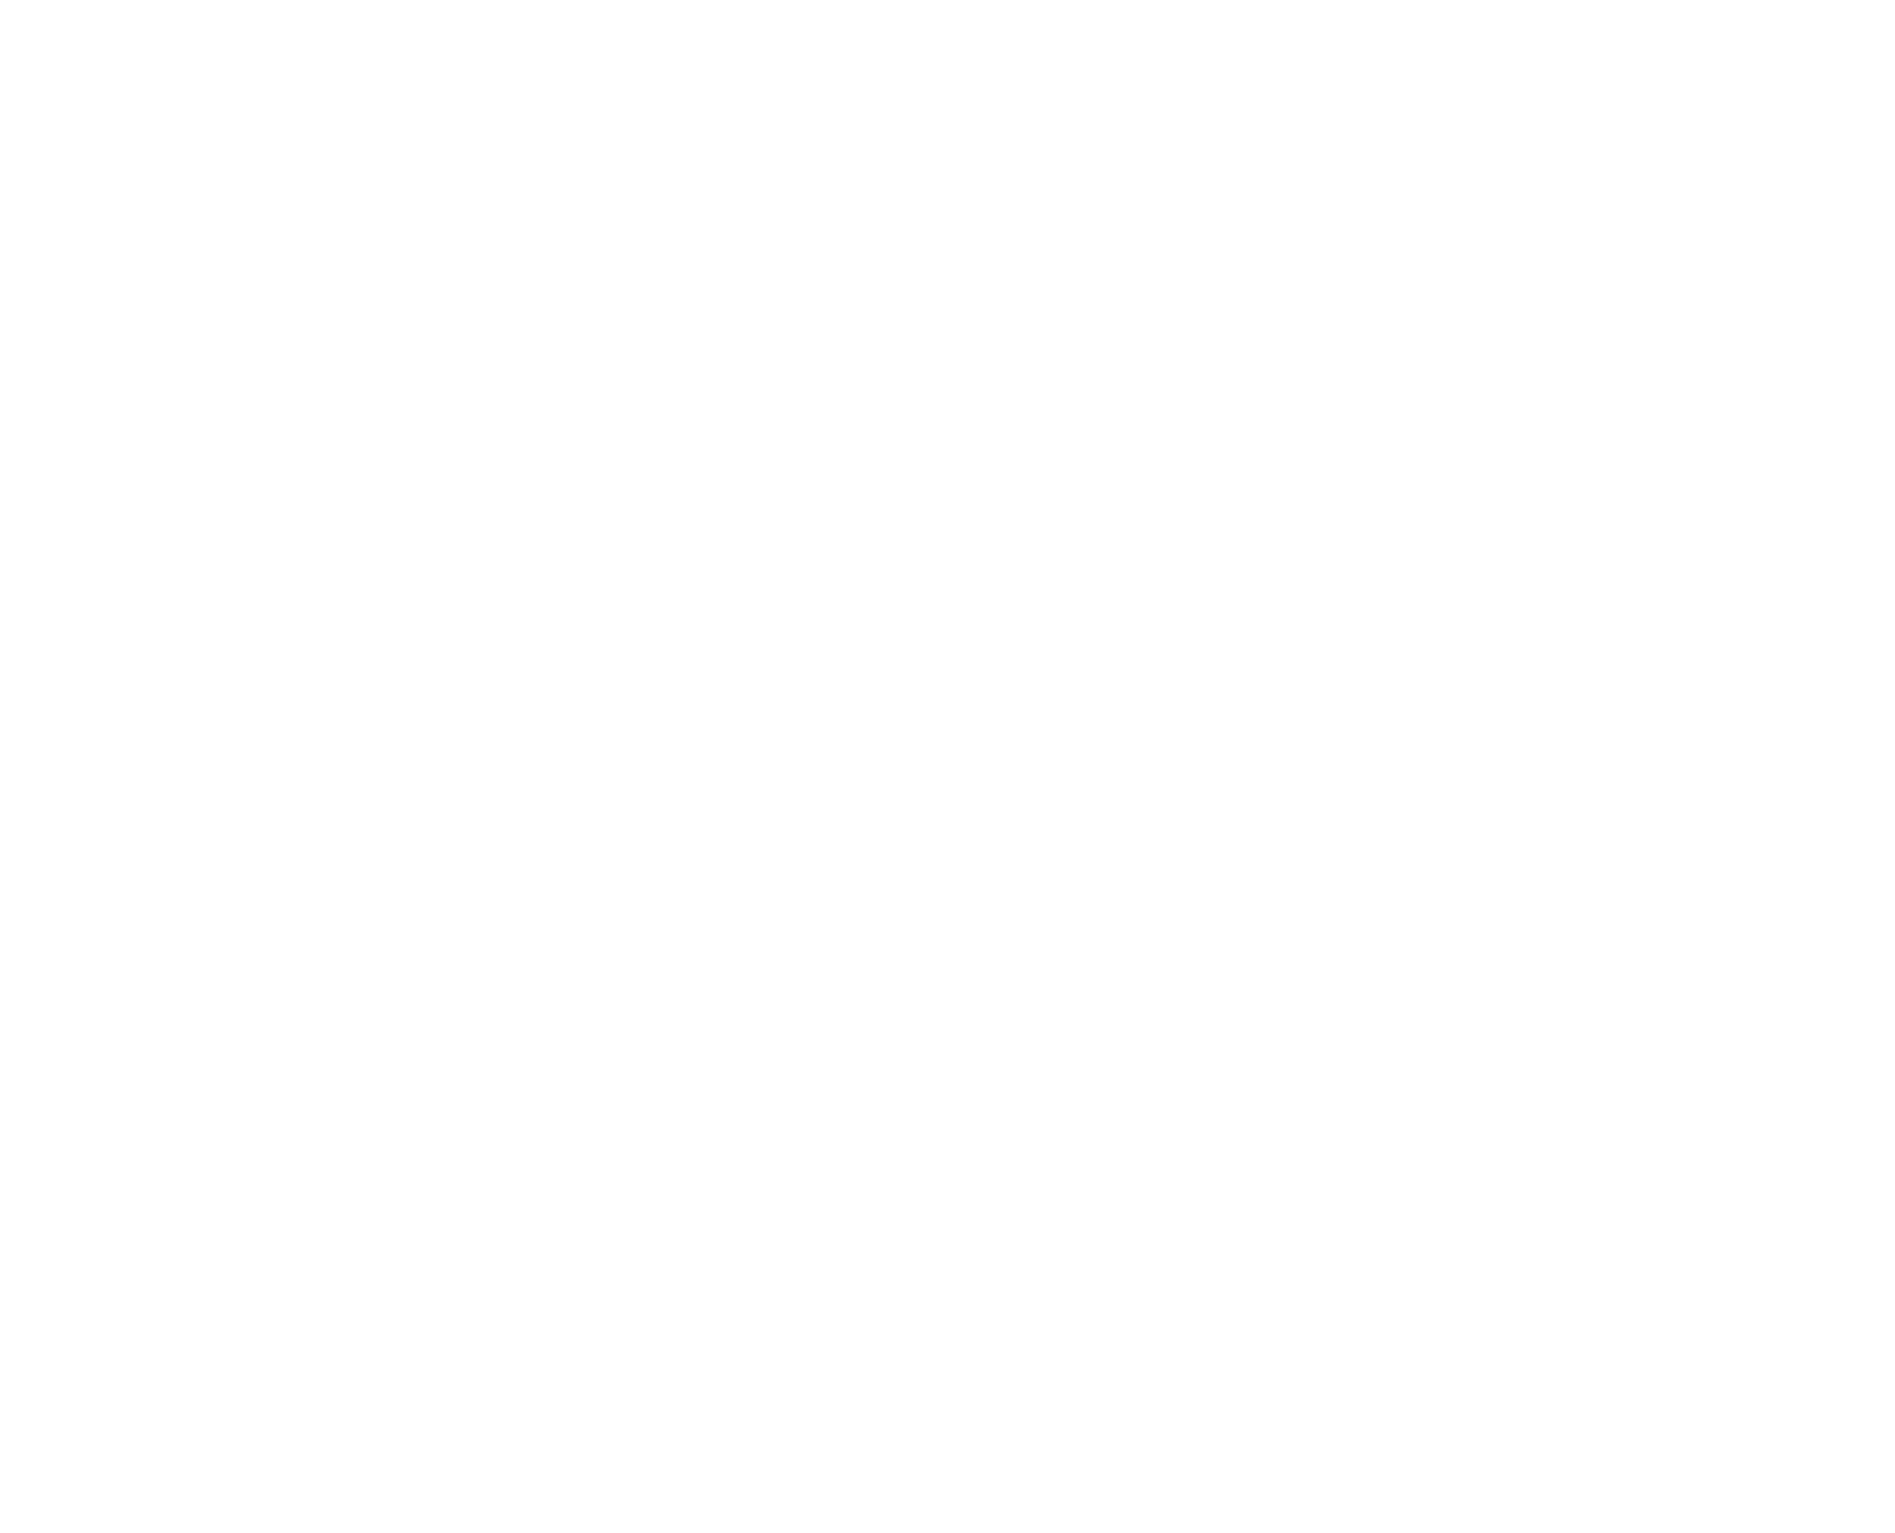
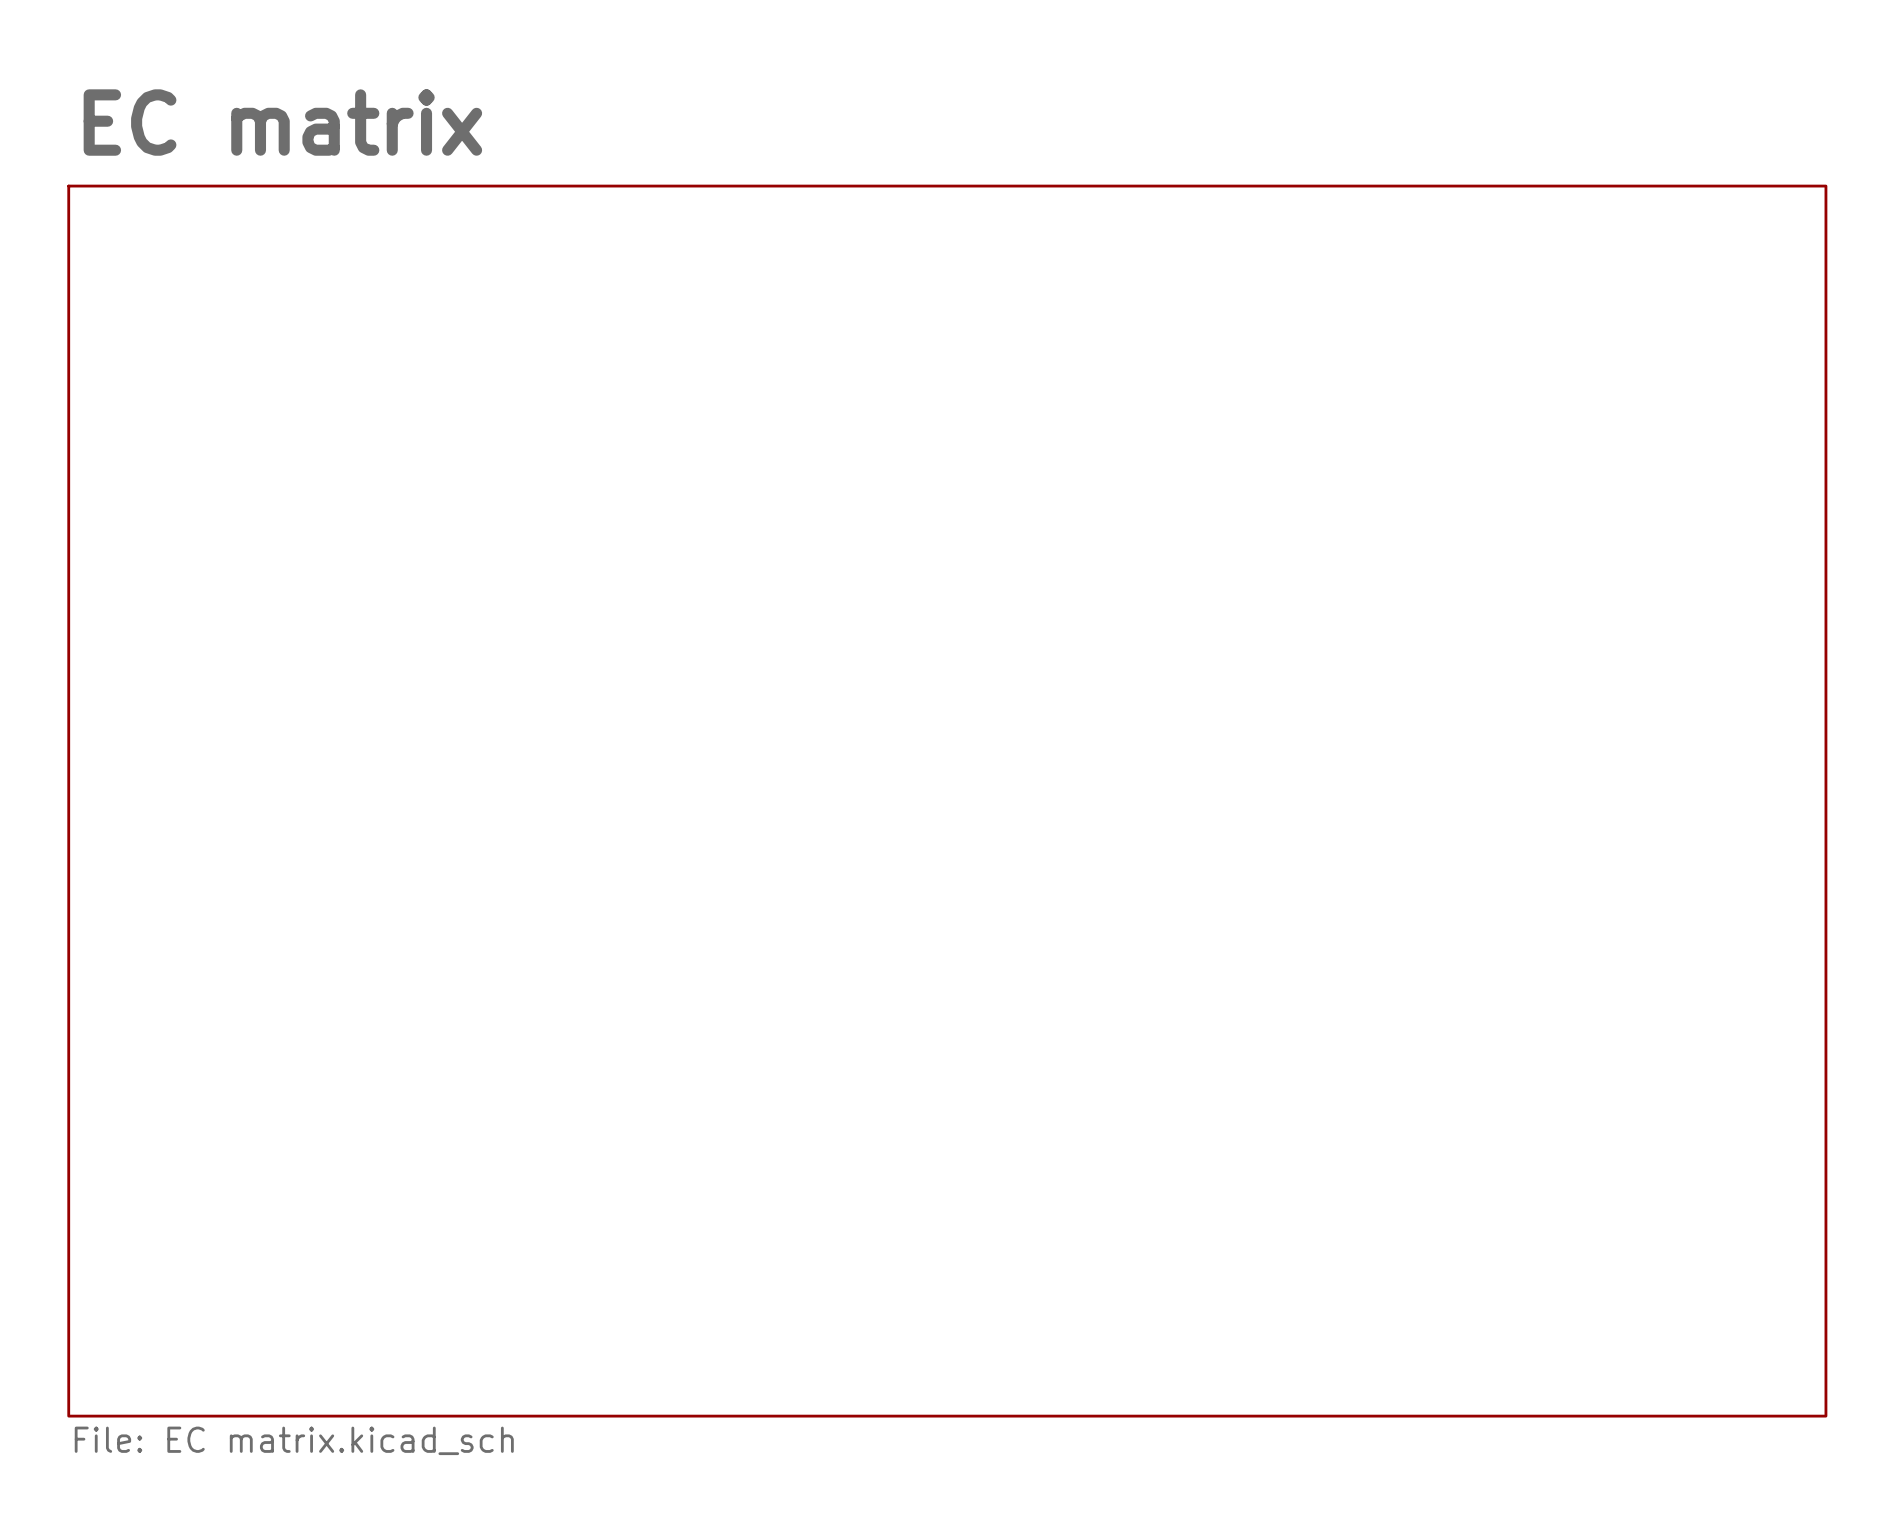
sheet EC matrix: none -> File: EC matrix.kicad_sch (947, 801)

